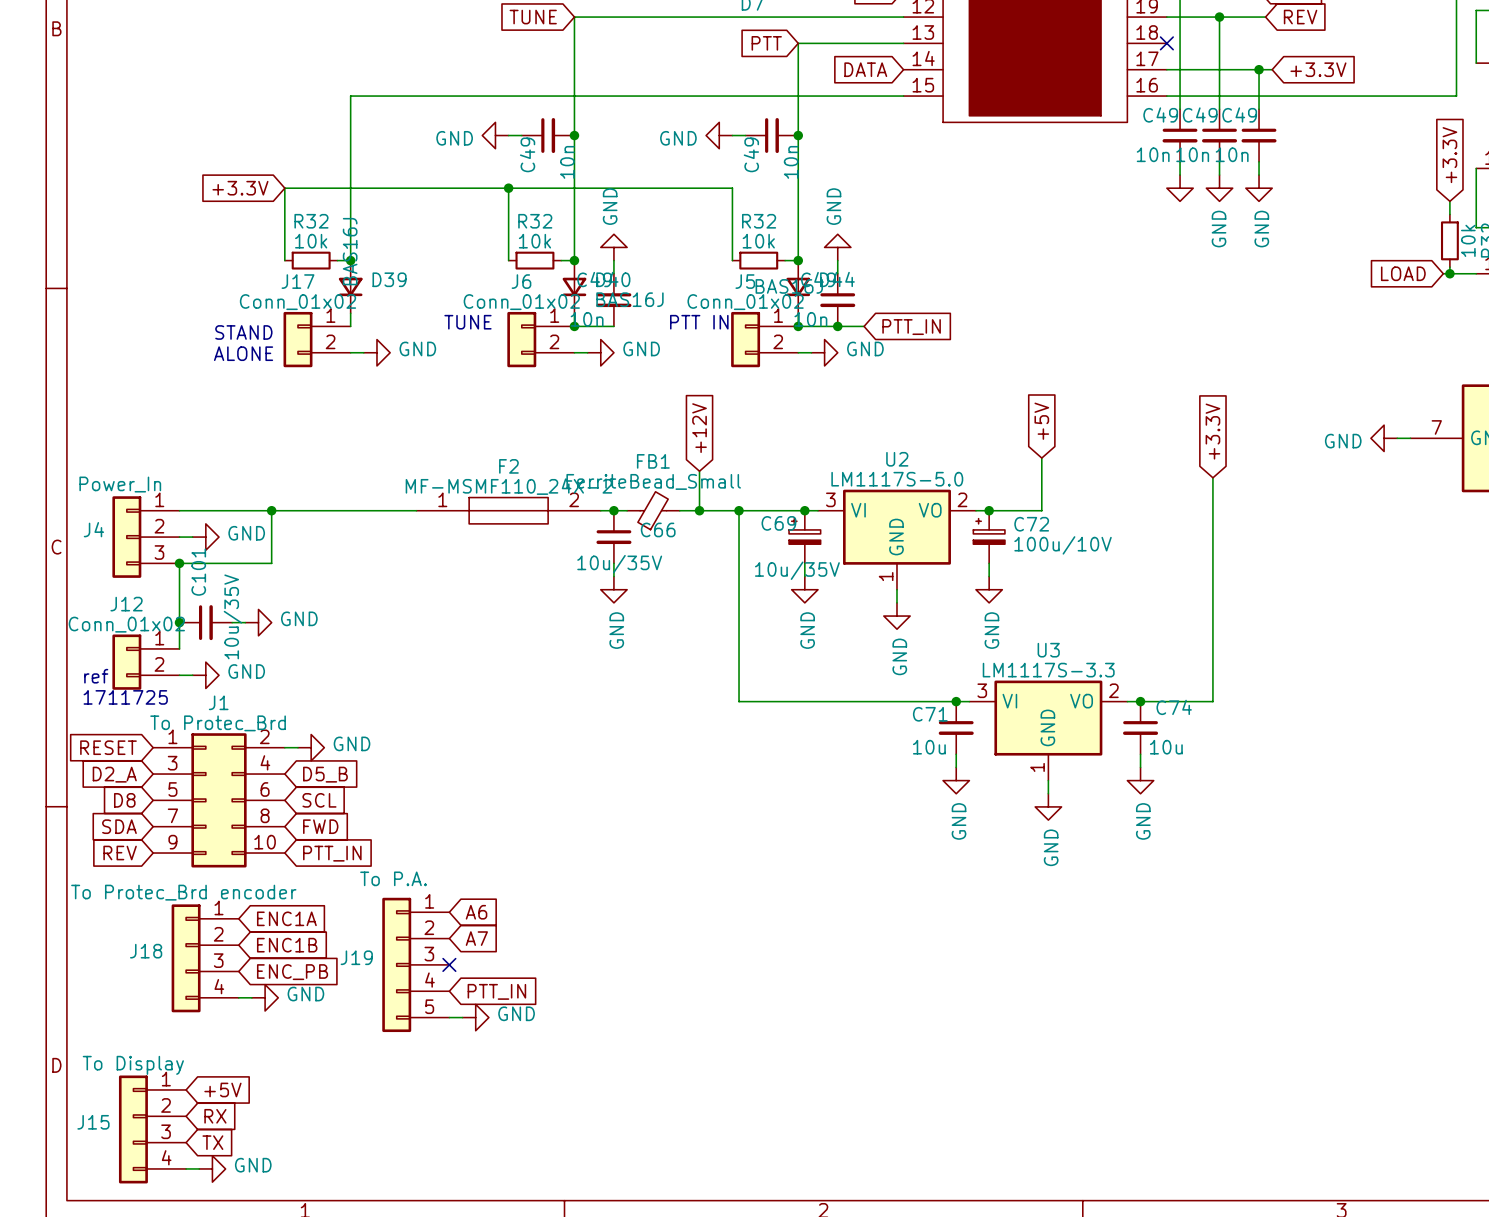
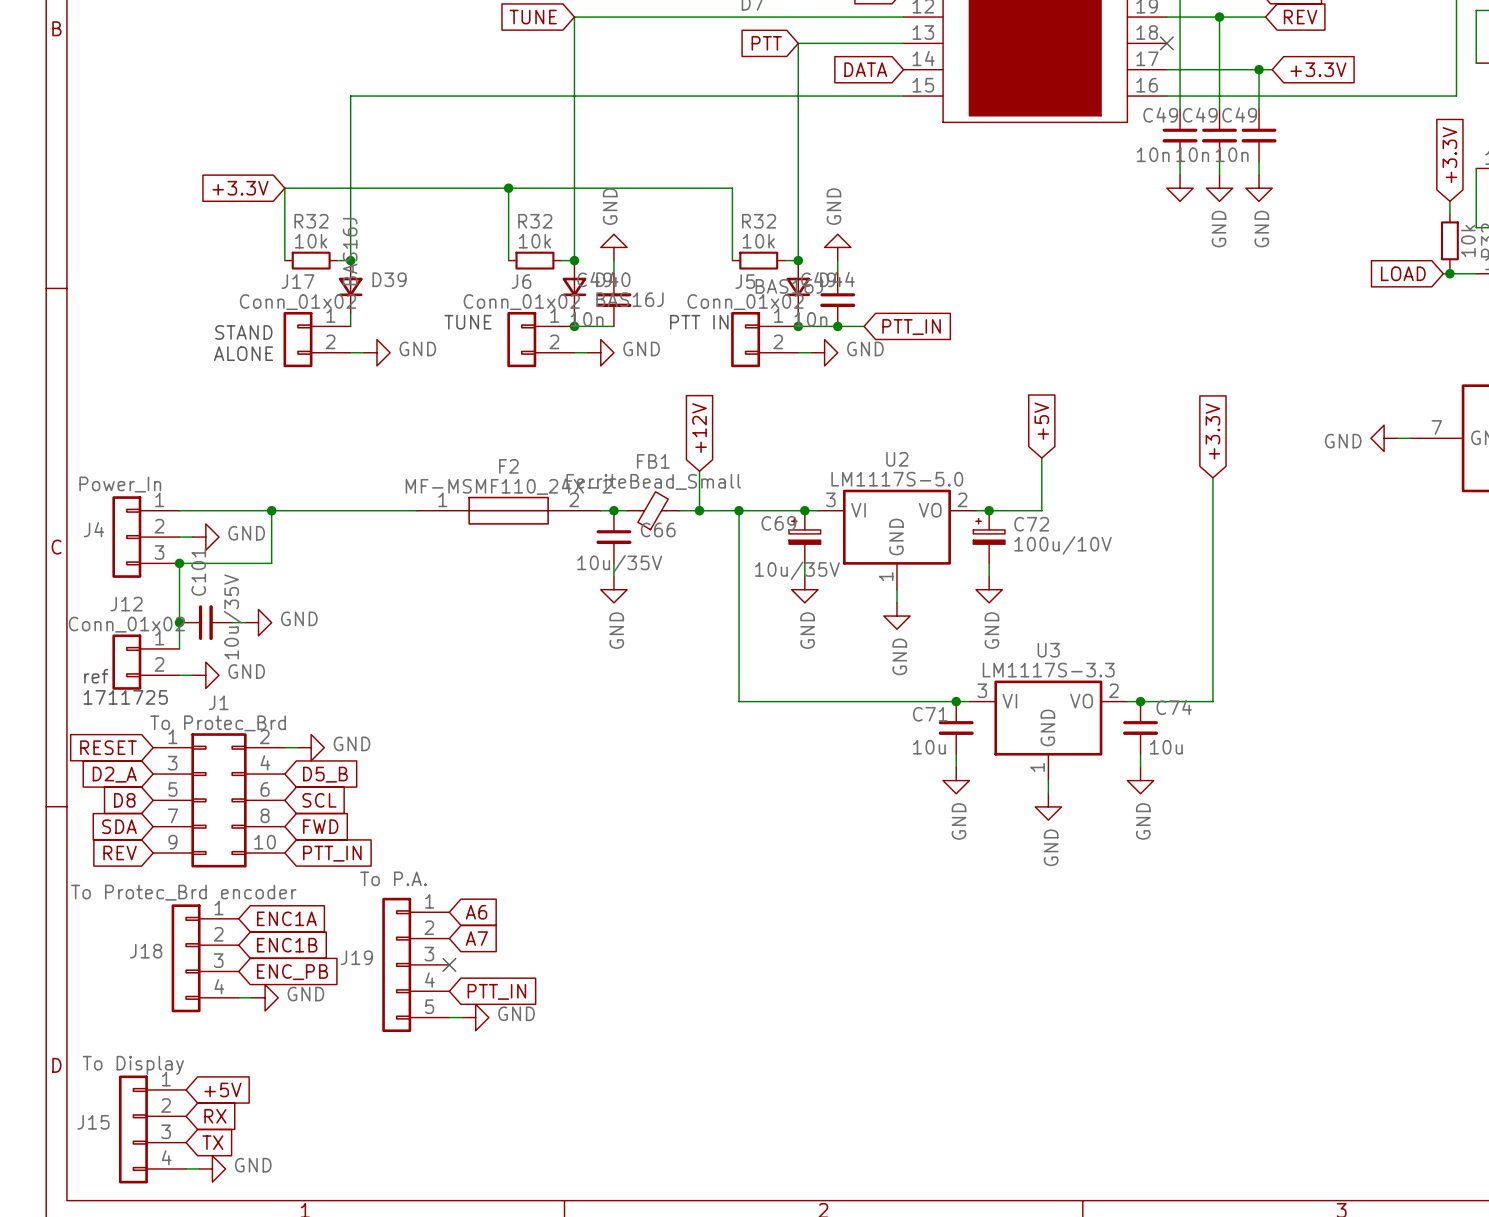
power symbol: GND (495, 135) -> none
wire: (508, 135) (521, 135) -> none
C49: 10n (548, 135) -> none
junction: (574, 135) -> none
power symbol: GND (719, 135) -> none
wire: (732, 135) (745, 135) -> none
C49: 10n (771, 135) -> none
junction: (798, 135) -> none

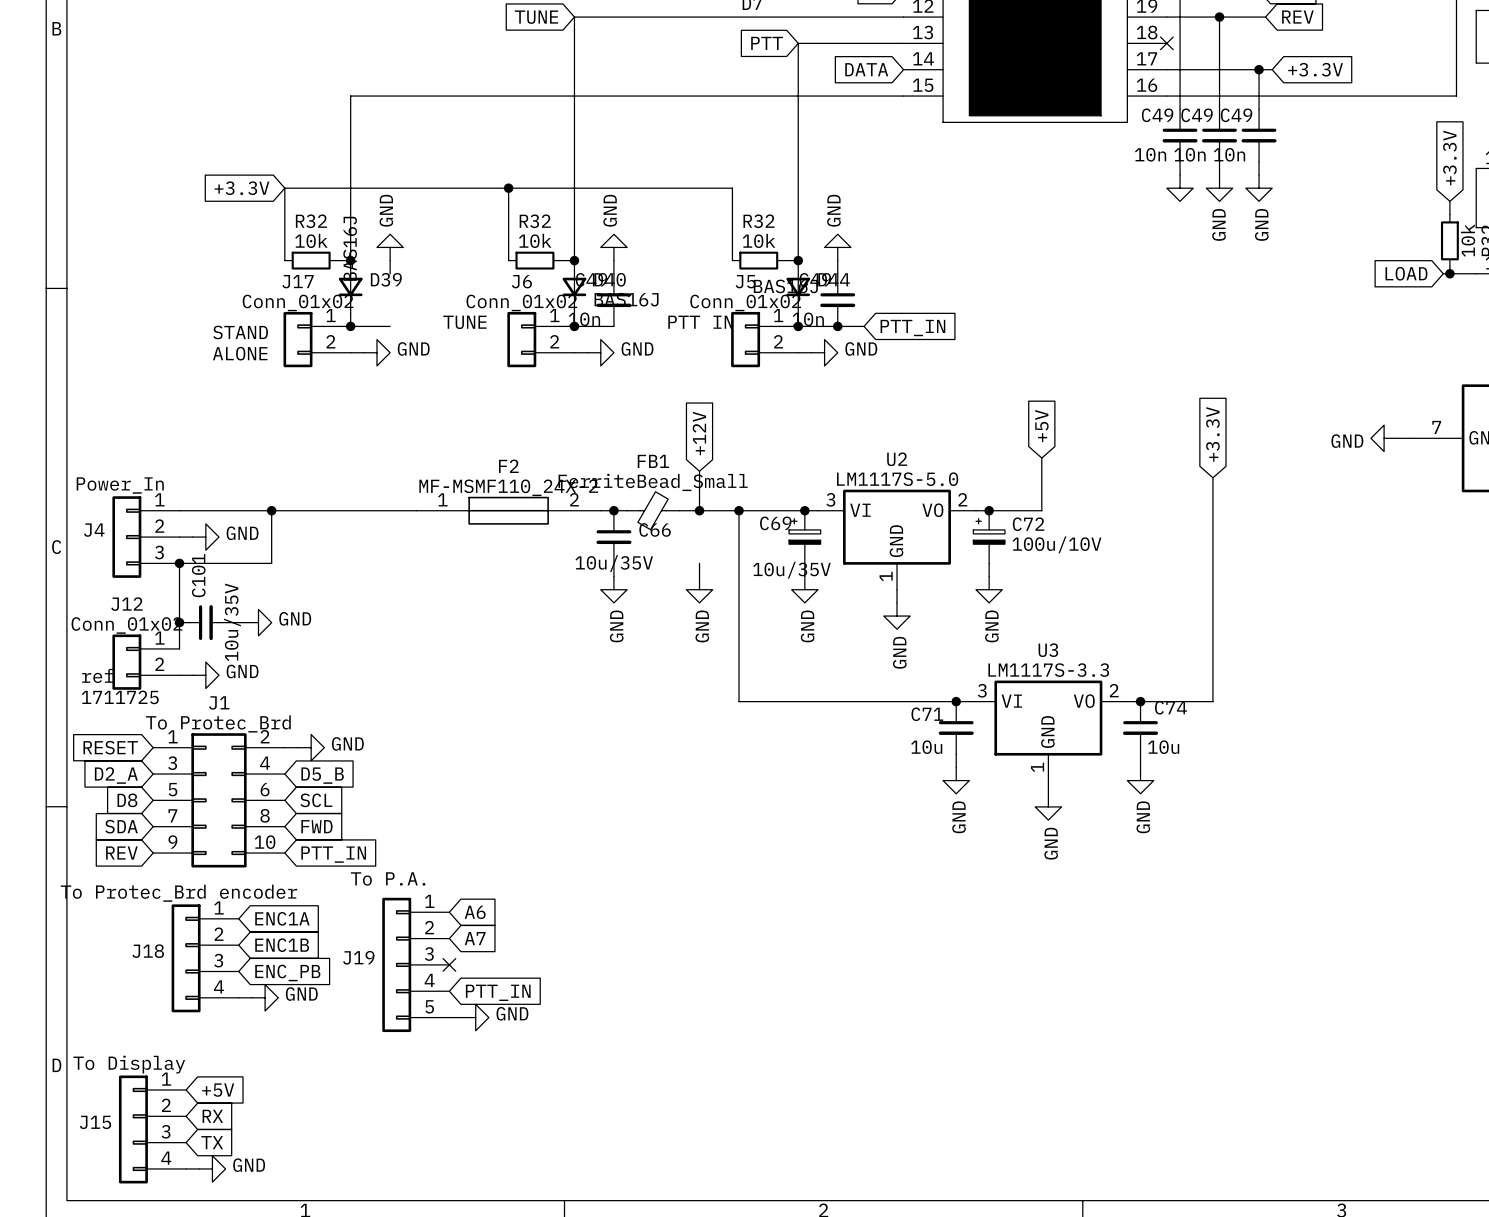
power symbol: none -> GND (390, 247)
wire: none -> (390, 260) (390, 273)
wire: none -> (350, 326) (390, 326)
junction: none -> (350, 326)
wire: none -> (699, 563) (699, 576)
power symbol: none -> GND (699, 589)

